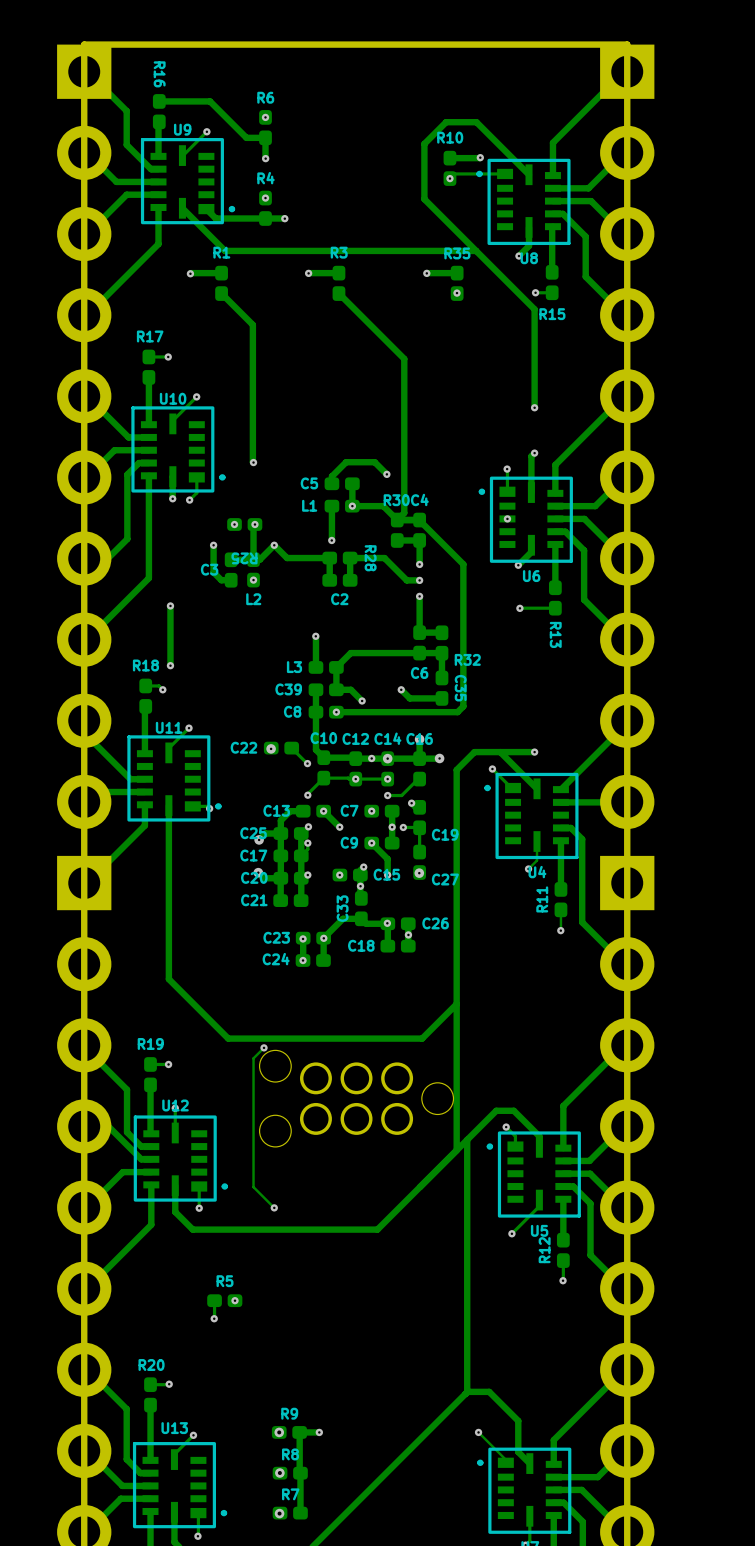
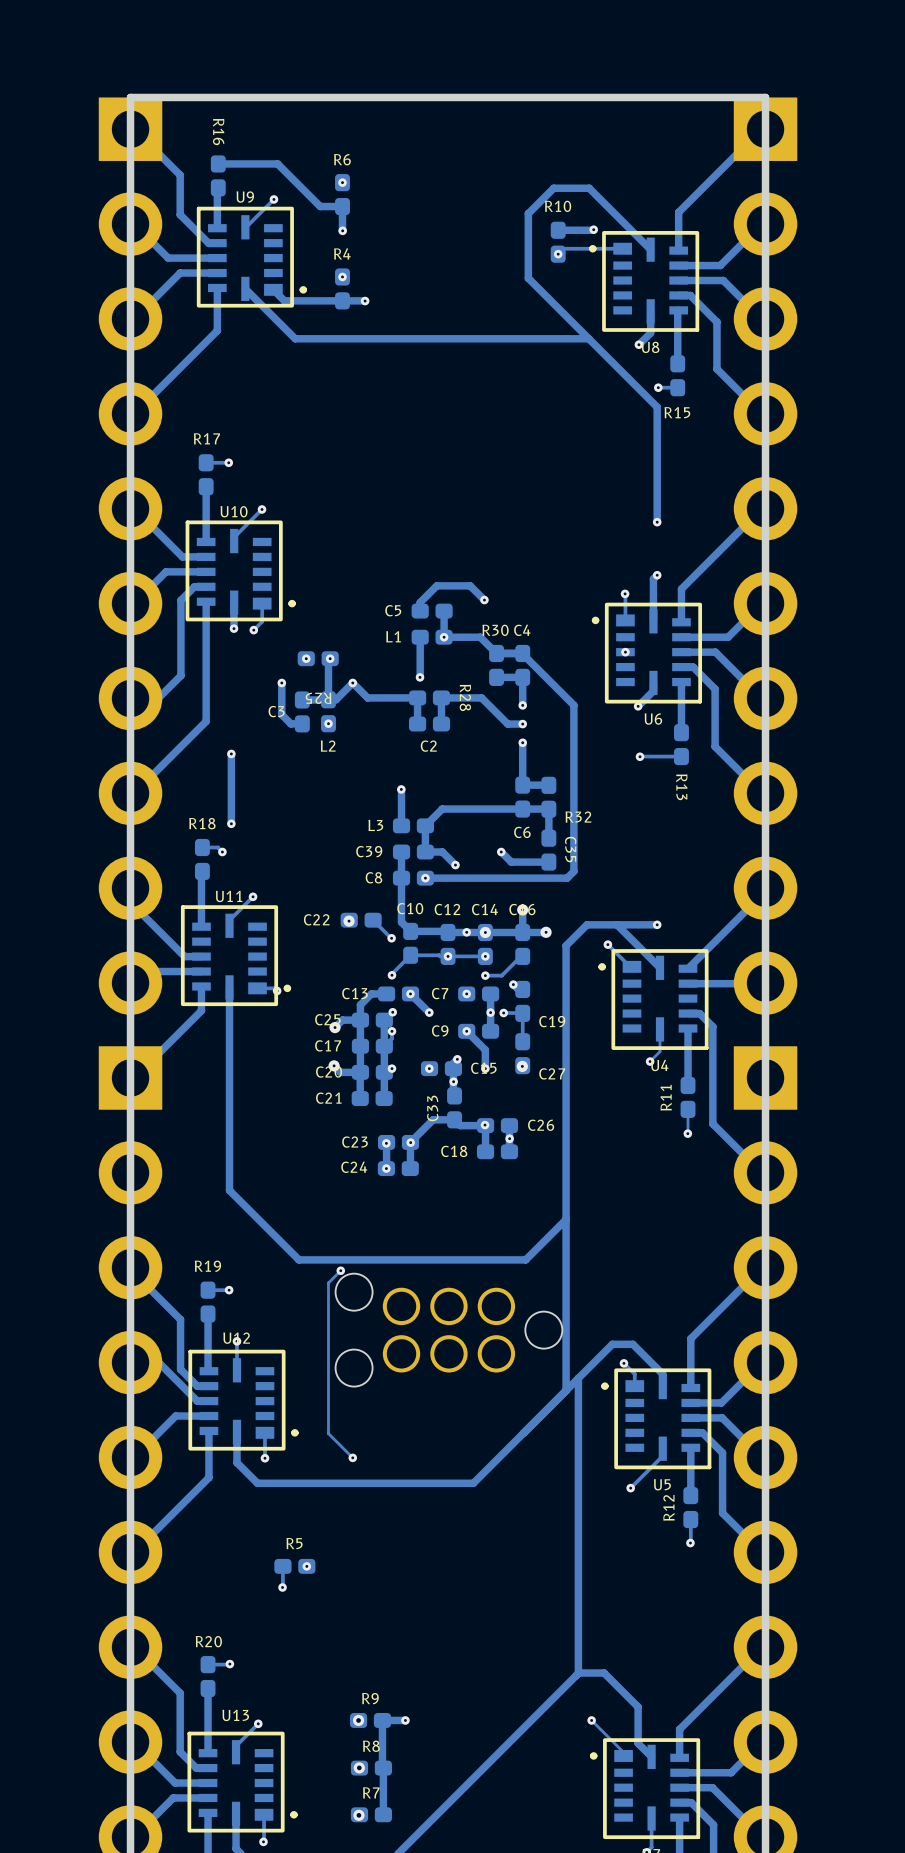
via: (190, 273) -> none
track: (221, 273) (190, 273) -> none
via: (308, 273) -> none
track: (338, 273) (308, 273) -> none
via: (426, 273) -> none
track: (457, 273) (427, 273) -> none
R1: (221, 283) -> none
R3: (338, 283) -> none
R35: (457, 283) -> none
track: (221, 293) (252, 324) (253, 462) -> none
track: (338, 293) (404, 358) (404, 513) (397, 520) -> none
via: (456, 293) -> none
via: (253, 462) -> none

